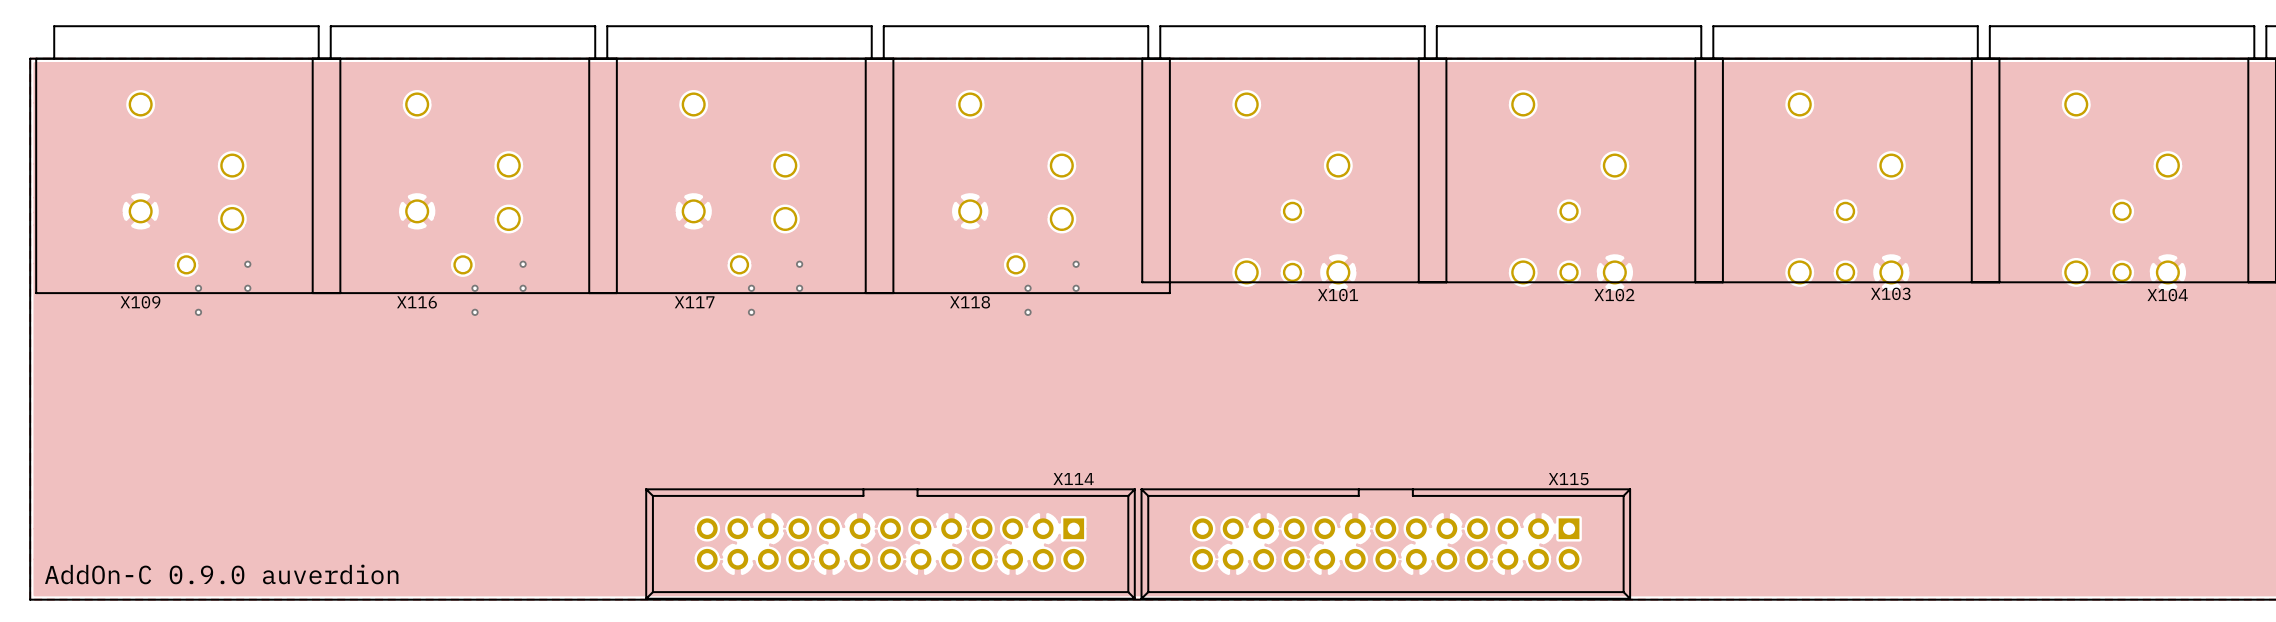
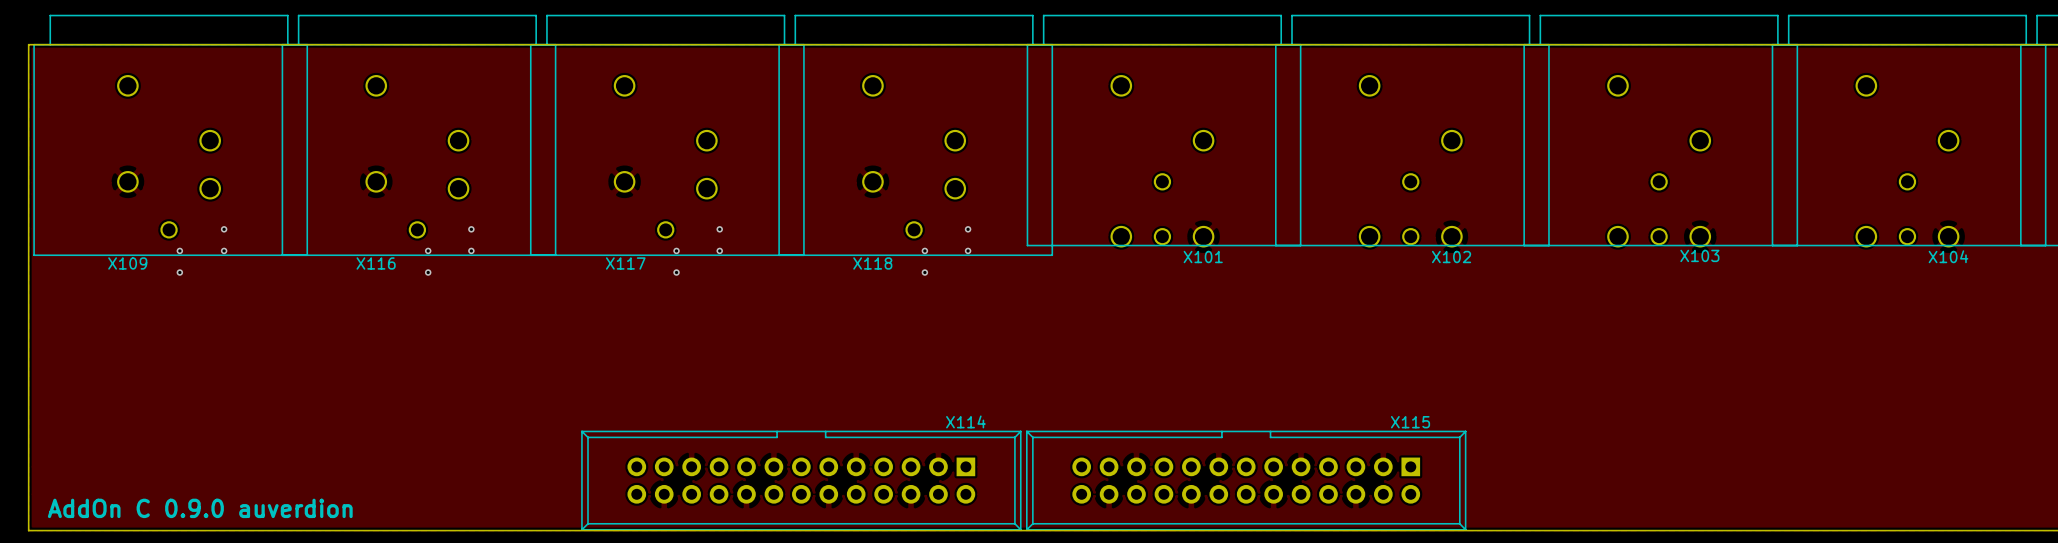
text: AddOn-C 0.9.0 auverdion (221, 574) -> AddOn C 0.9.0 auverdion (200, 508)

